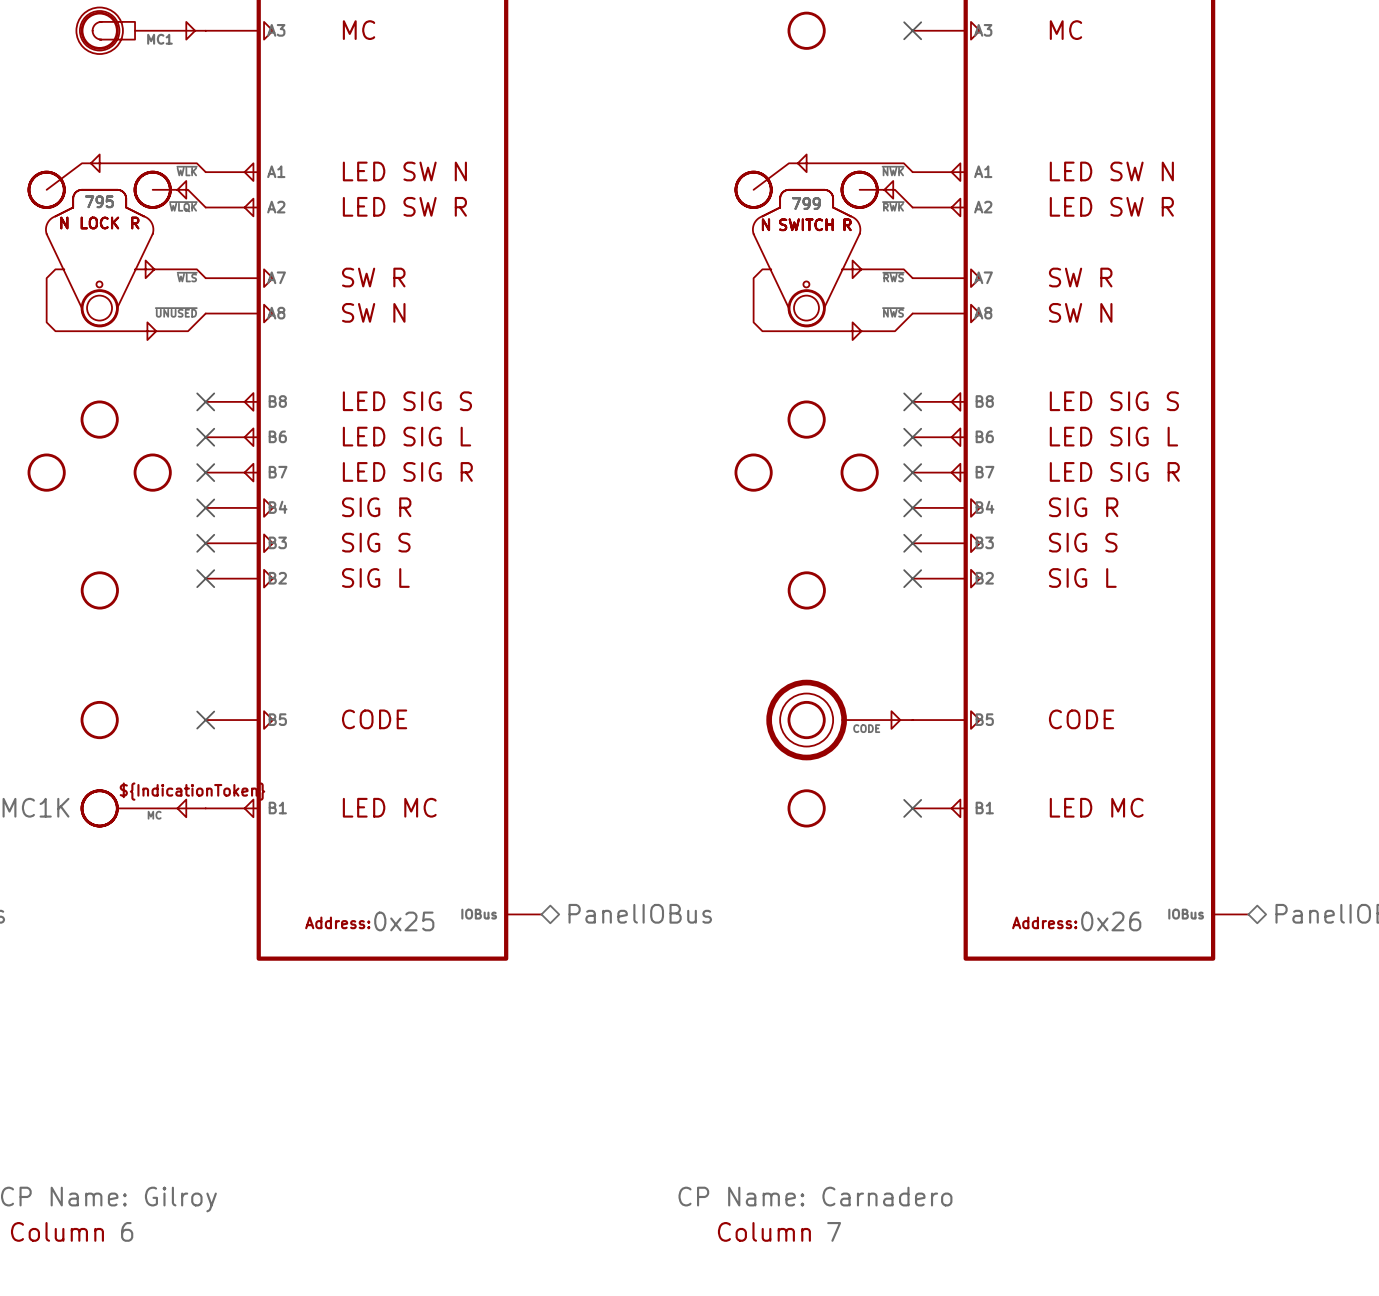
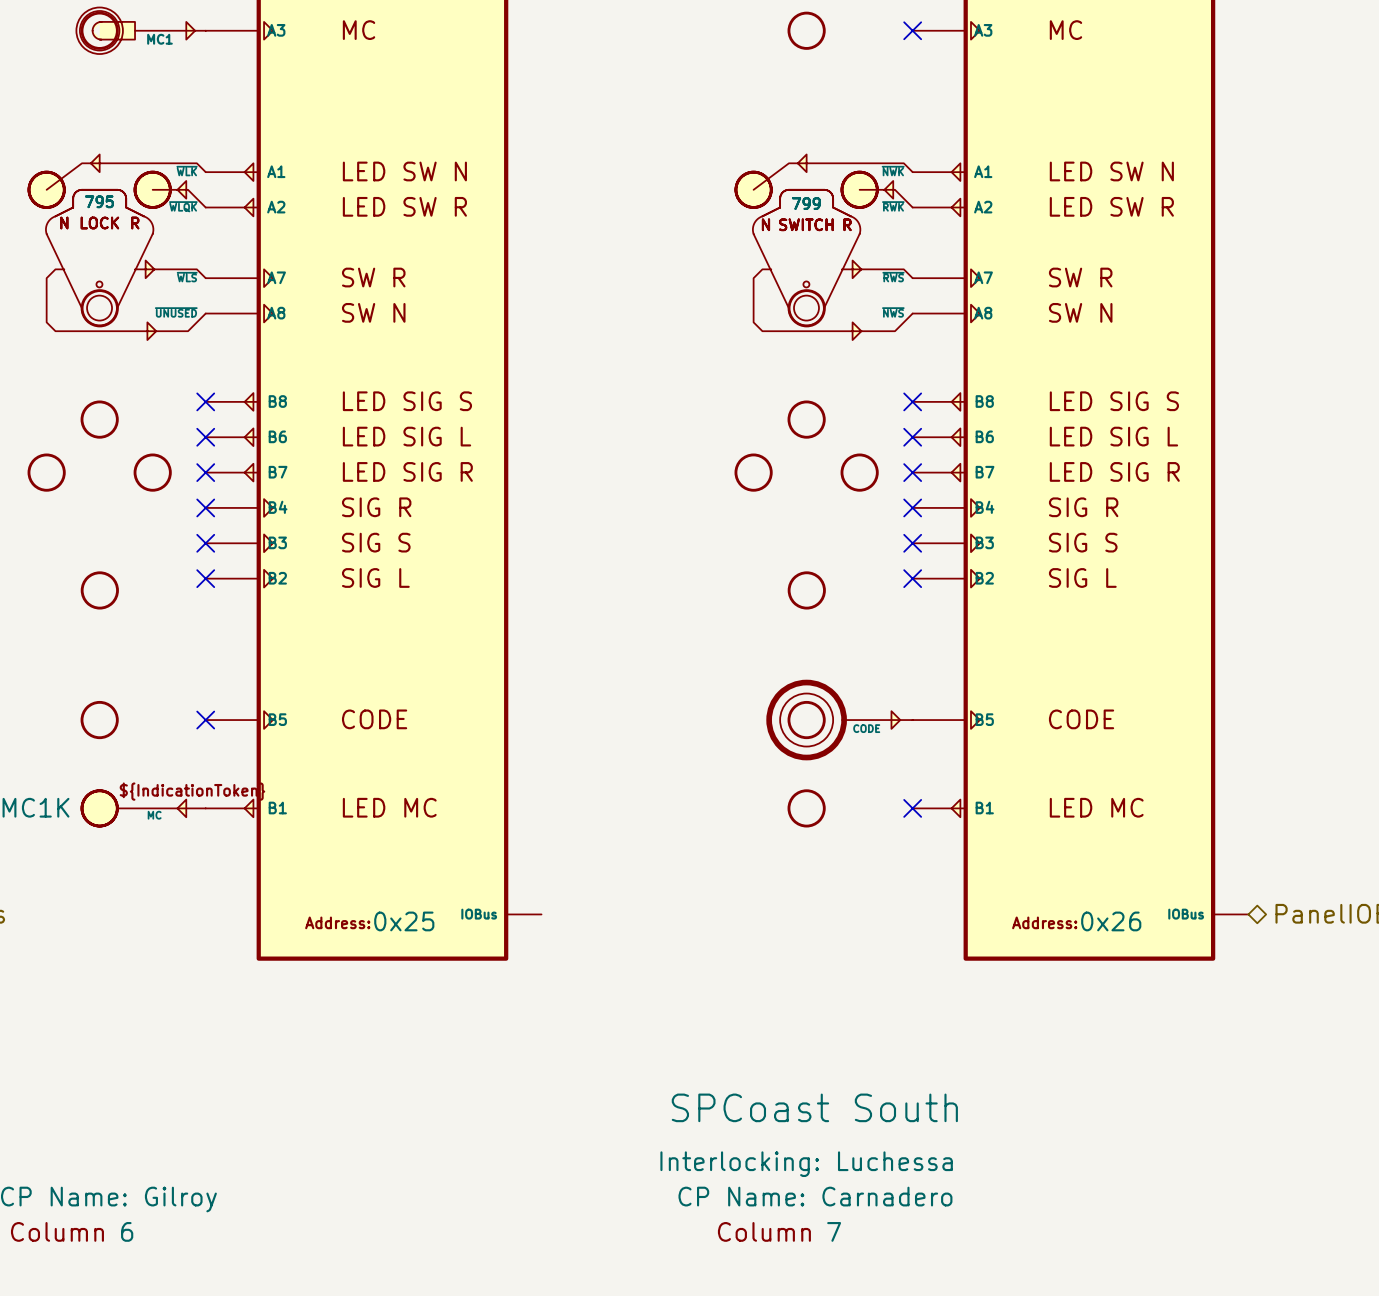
hierarchical label: PanelIOBus (640, 913) -> none
part text: none -> SPCoast South (814, 1107)
part text: none -> Interlocking: Luchessa (806, 1164)

